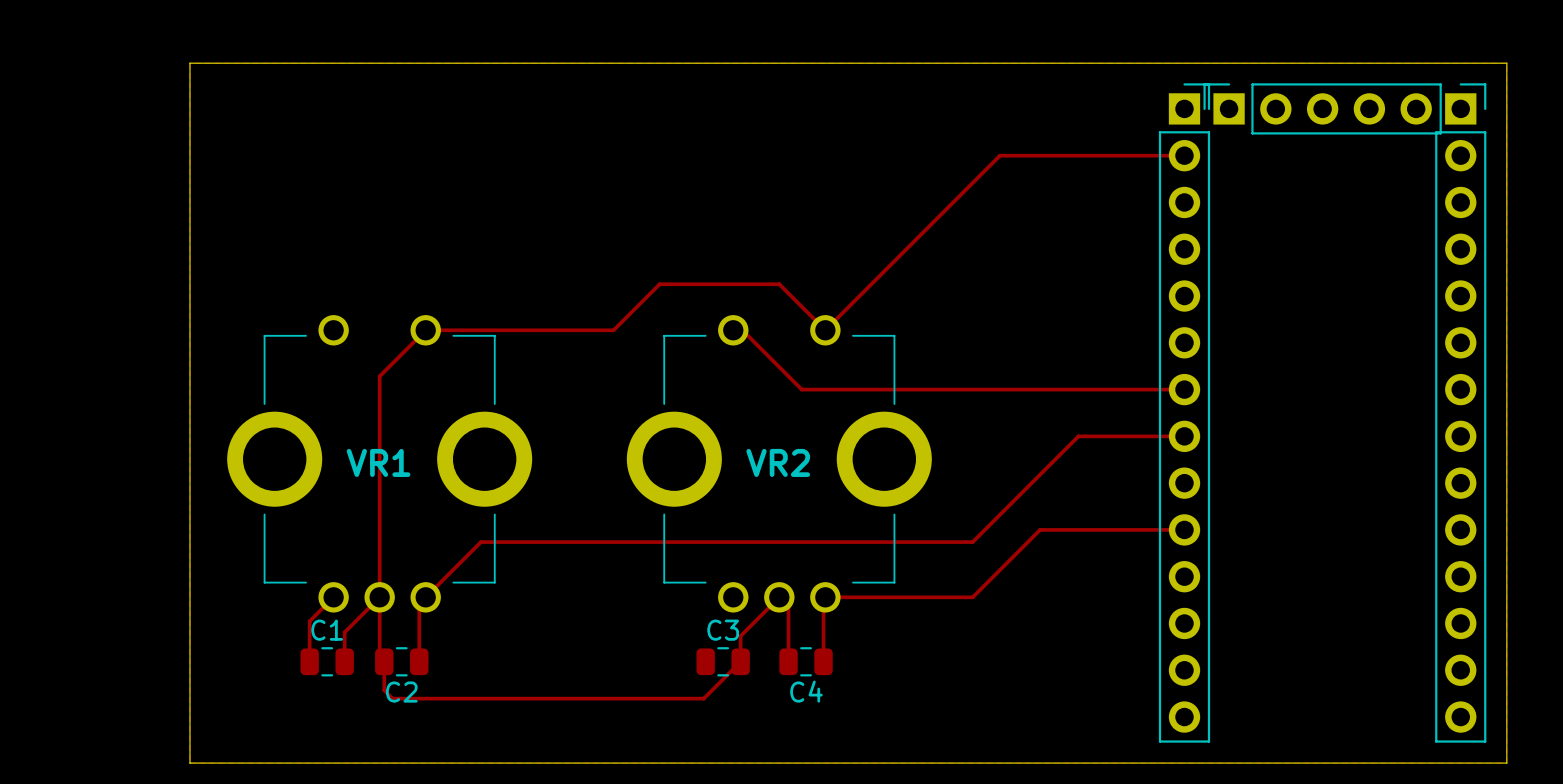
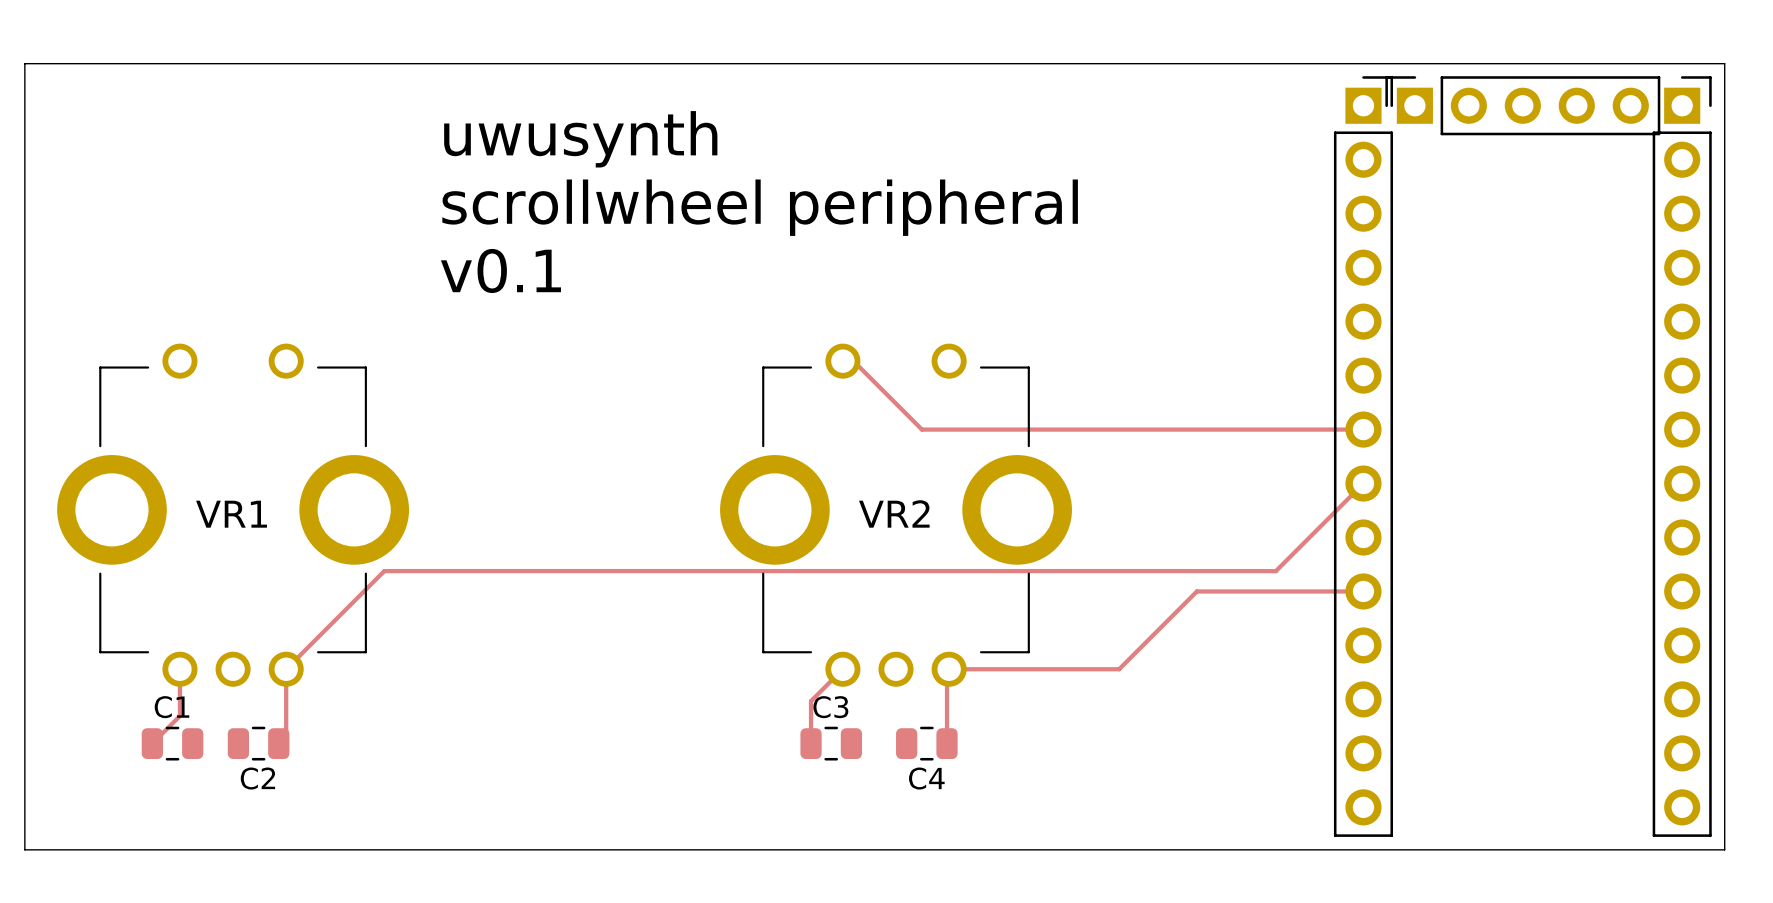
board edge: (189, 63) (1506, 63) (1506, 763) (189, 763) (189, 63) -> (24, 63) (24, 849) (1724, 849) (1724, 63) (24, 63)
text: none -> uwusynth (580, 139)
track: (1184, 155) (999, 155) (825, 330) (779, 284) (659, 284) (613, 330) (425, 330) (379, 376) (379, 657) (384, 661) (384, 690) (392, 698) (703, 698) (740, 661) (740, 636) (779, 597) -> none
text: none -> scrollwheel peripheral (760, 207)
text: none -> v0.1 (500, 270)
track: (1184, 436) (1078, 436) (972, 542) (480, 542) (419, 603) (419, 661) -> (1363, 483) (1275, 571) (384, 571) (286, 669) (286, 736) (278, 743)
VR1 position: (379, 463) -> (233, 515)
track: none -> (179, 669) (179, 715) (152, 743)
track: (333, 597) (309, 621) (309, 661) -> none
track: (379, 597) (344, 632) (344, 661) -> none
track: none -> (842, 669) (811, 701) (811, 743)
track: (788, 606) (788, 661) -> none
C1 position: (327, 661) -> (172, 743)
C2 position: (401, 661) -> (258, 743)

